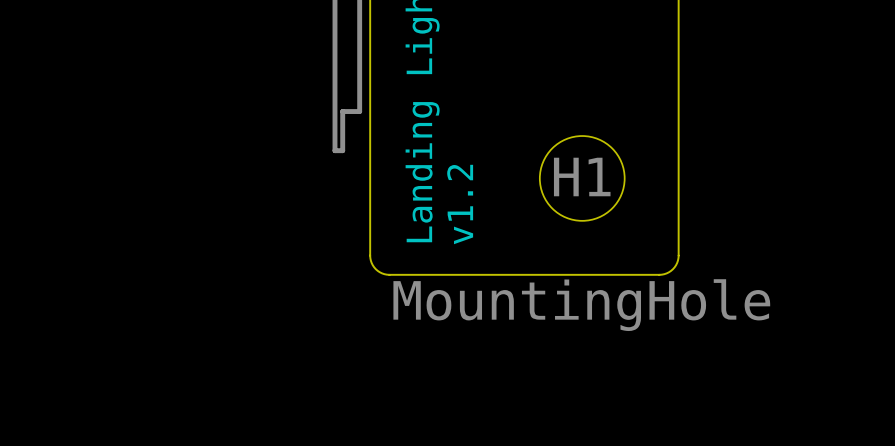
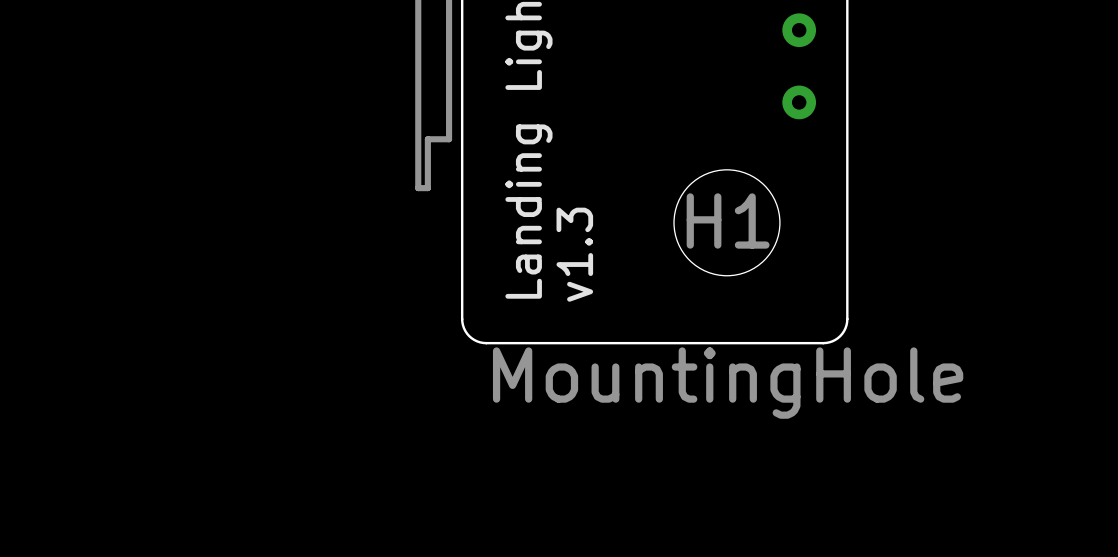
via: none -> (799, 30)
via: none -> (799, 102)
text: v1.2 (460, 204) -> v1.3 (574, 254)

